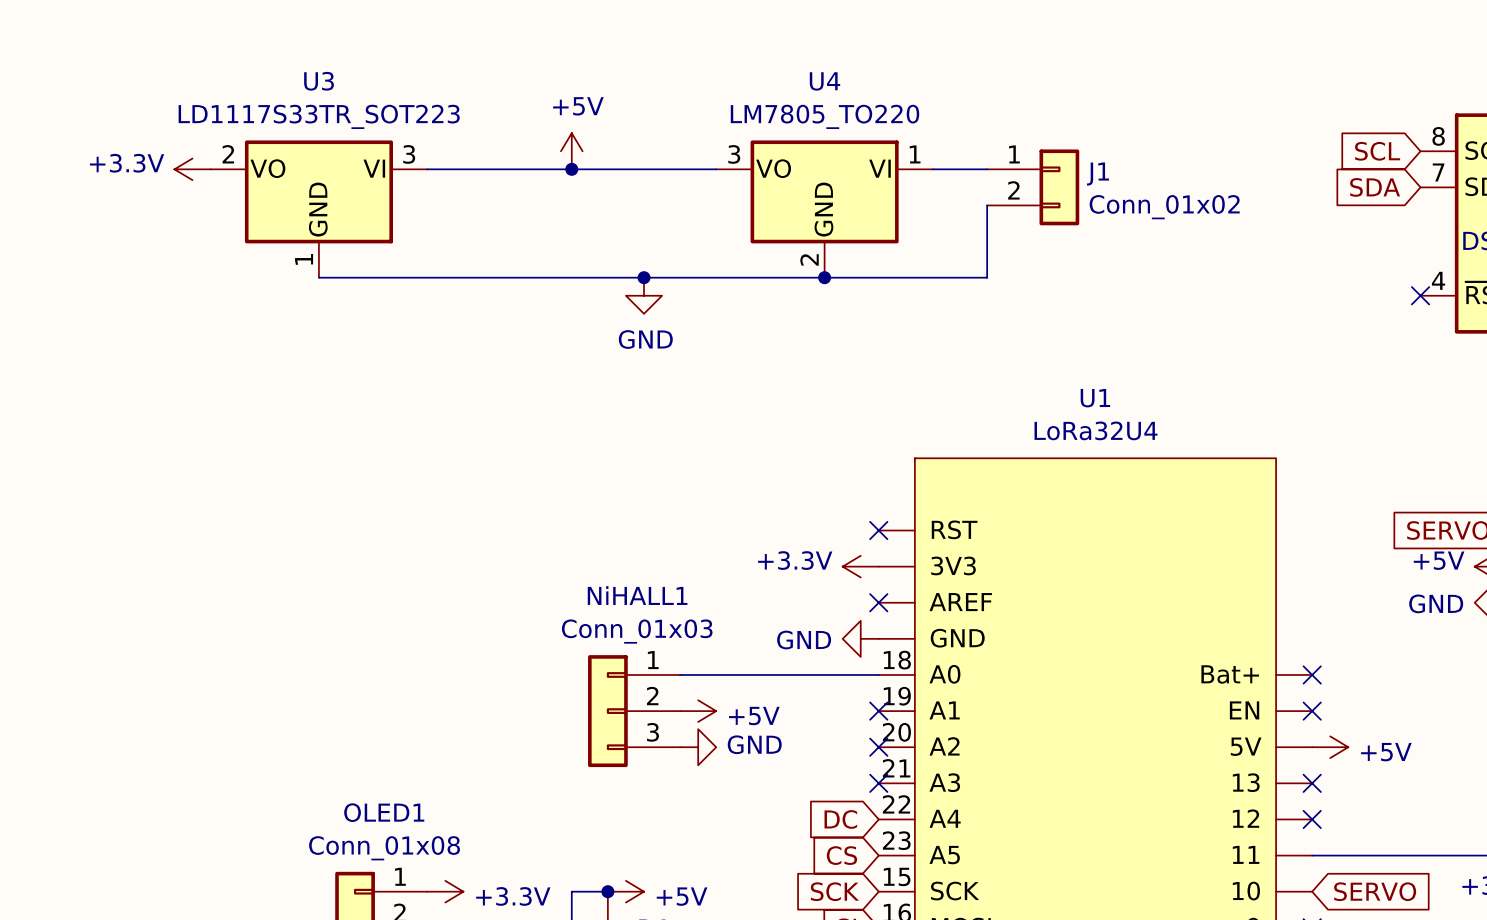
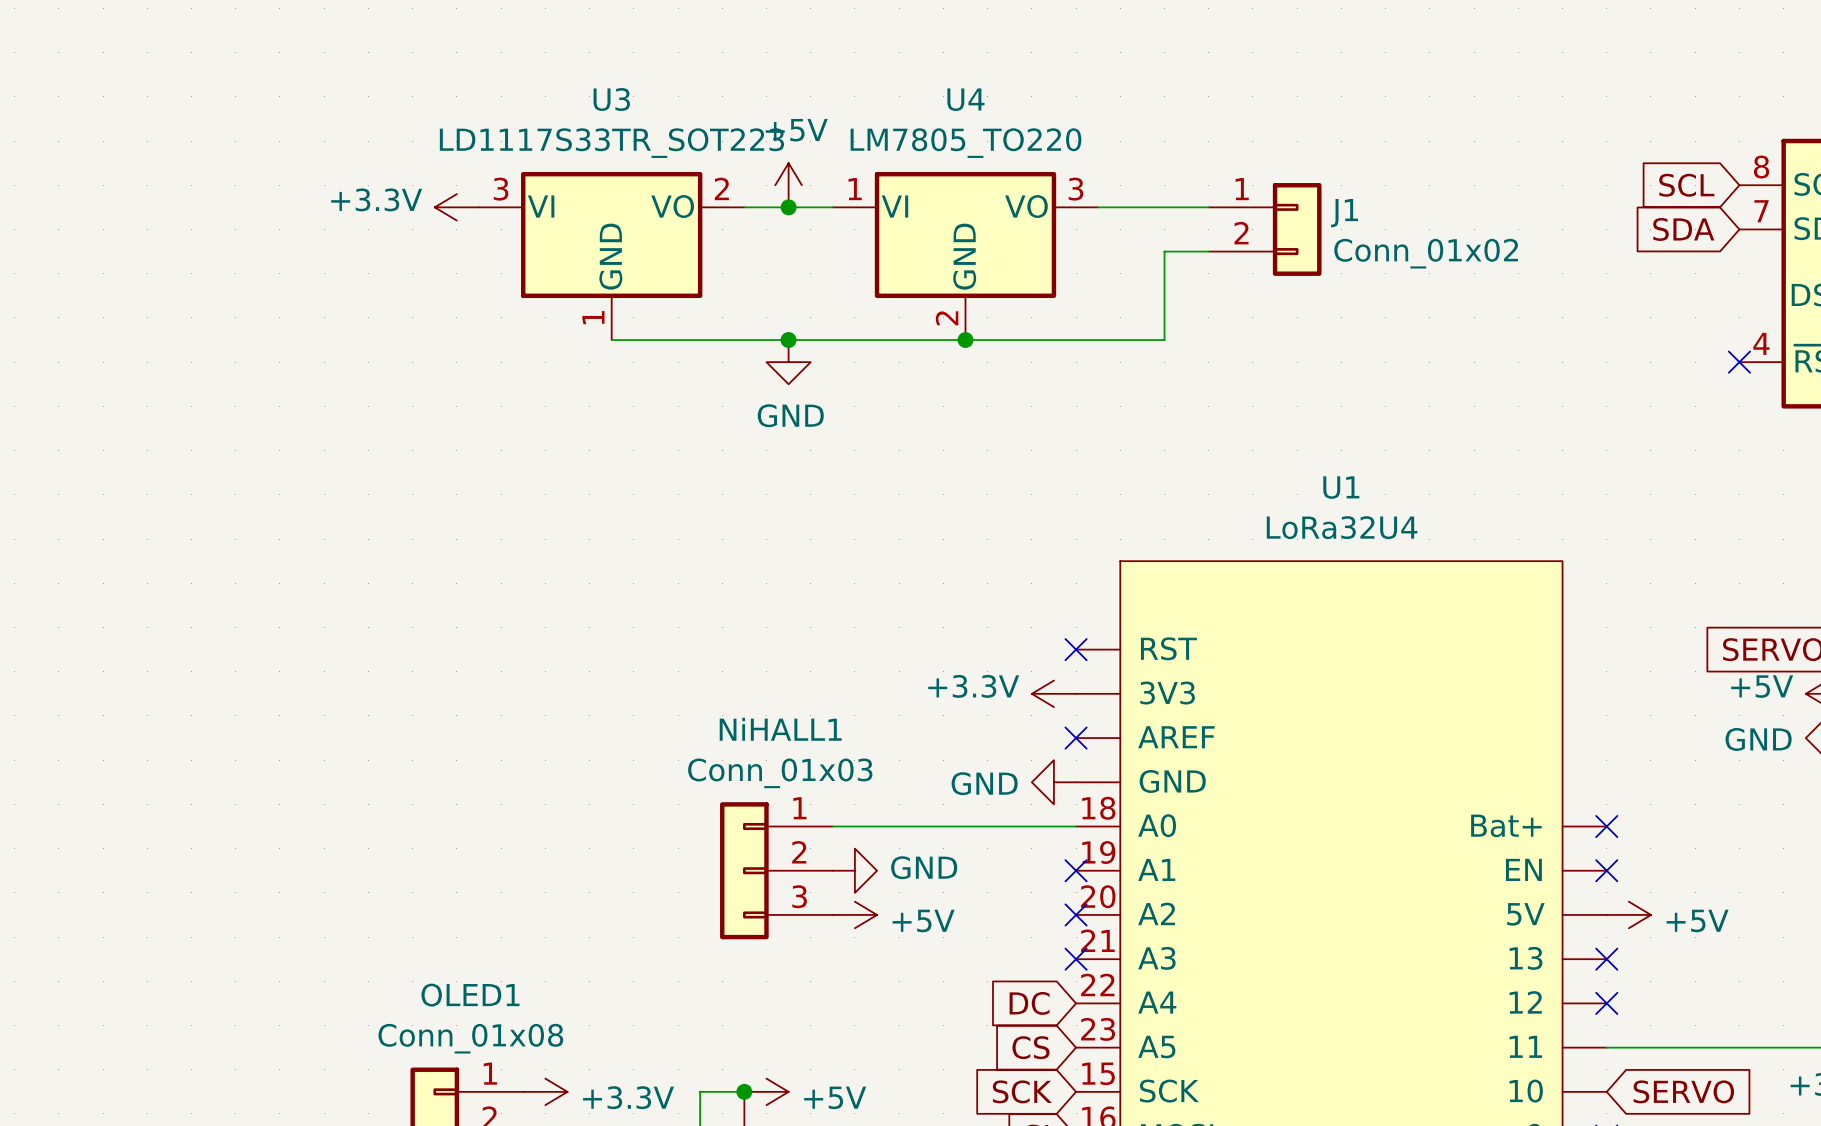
power symbol position: +5V (571, 151) -> +5V (788, 185)
power symbol position: +3.3V (192, 169) -> +3.3V (456, 207)
junction position: (571, 169) -> (788, 207)
U3 flip: as is (318, 191) -> left-right (611, 234)
U4 flip: as is (824, 191) -> left-right (965, 234)
wire: (987, 205) (987, 277) (951, 277) -> (1208, 251) (1164, 251) (1164, 340)
U3 position: (318, 209) -> (611, 255)
wire: (318, 277) (499, 277) -> none
junction position: (824, 277) -> (965, 340)
power symbol: +5V (698, 711) -> GND (854, 870)
power symbol: GND (698, 747) -> +5V (854, 914)

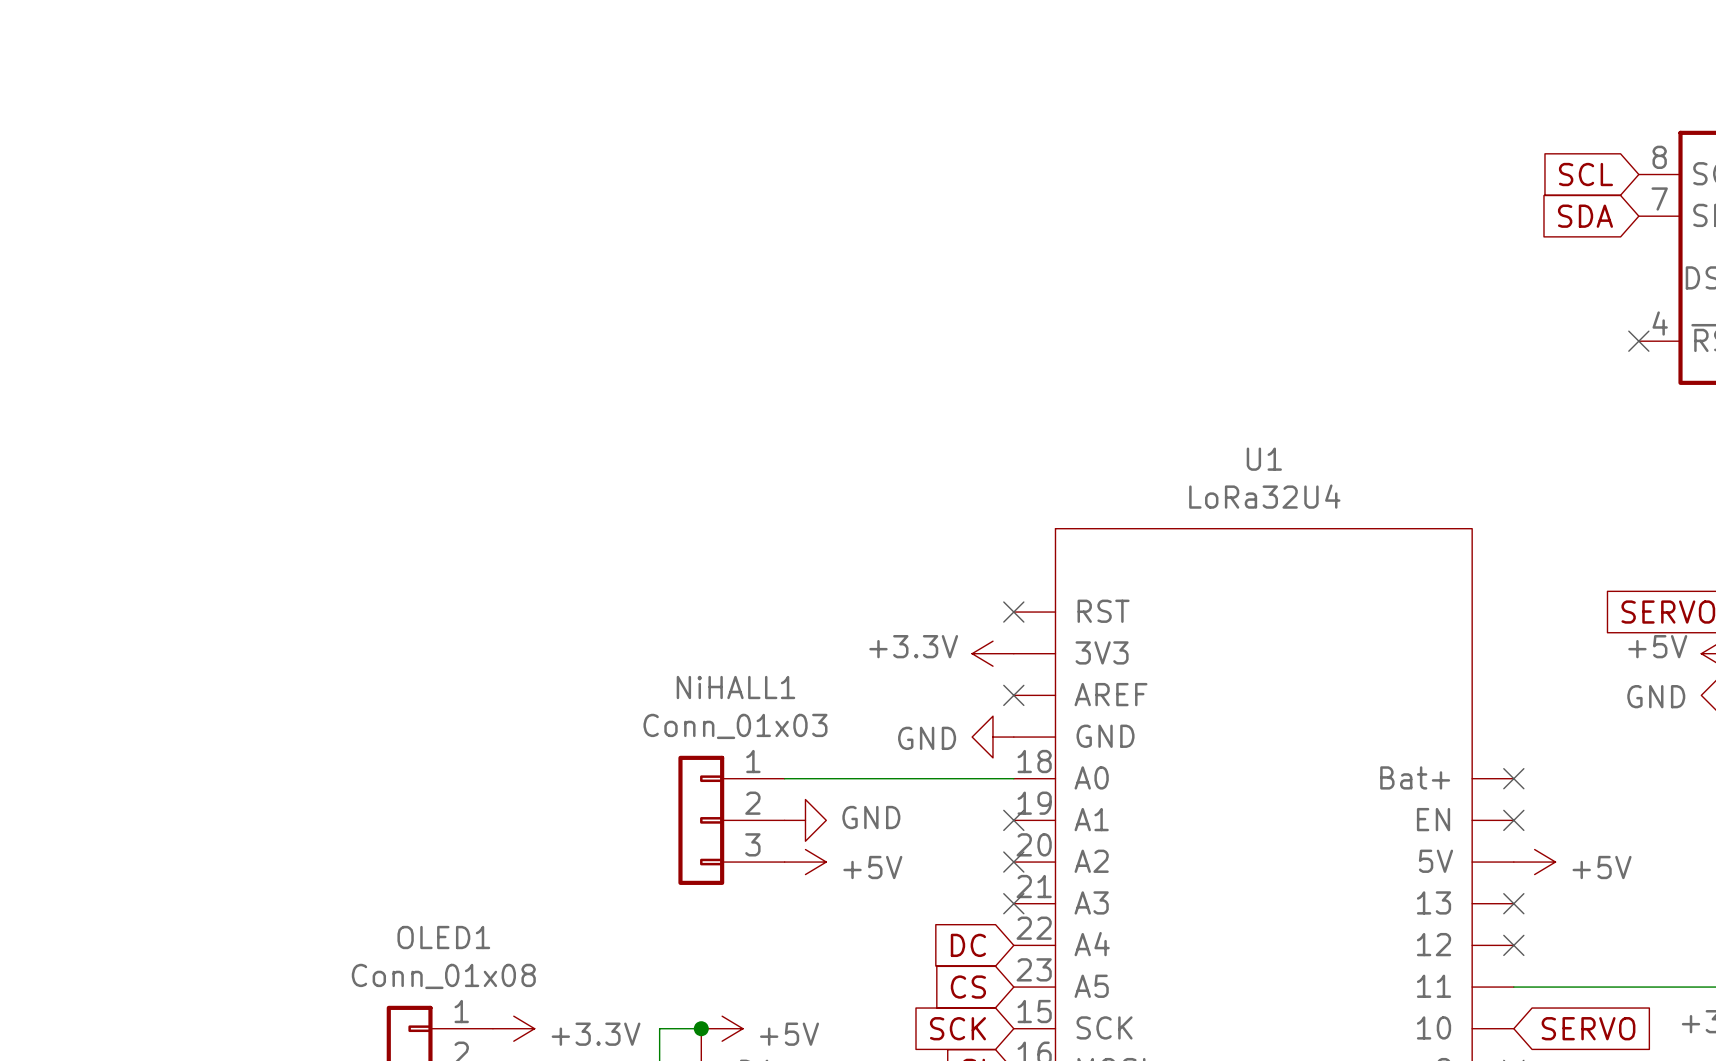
power symbol: +5V (788, 185) -> none
power symbol: +3.3V (456, 207) -> none
wire: (744, 207) (832, 207) -> none
junction: (788, 207) -> none
wire: (1098, 207) (1208, 207) -> none
J1: Conn_01x02 (1265, 229) -> none
wire: (1208, 251) (1164, 251) (1164, 340) (611, 340) -> none
U3: LD1117S33TR_SOT223 (611, 255) -> none
U4: LM7805_TO220 (965, 255) -> none
junction: (788, 340) -> none
junction: (965, 340) -> none
power symbol: GND (788, 362) -> none

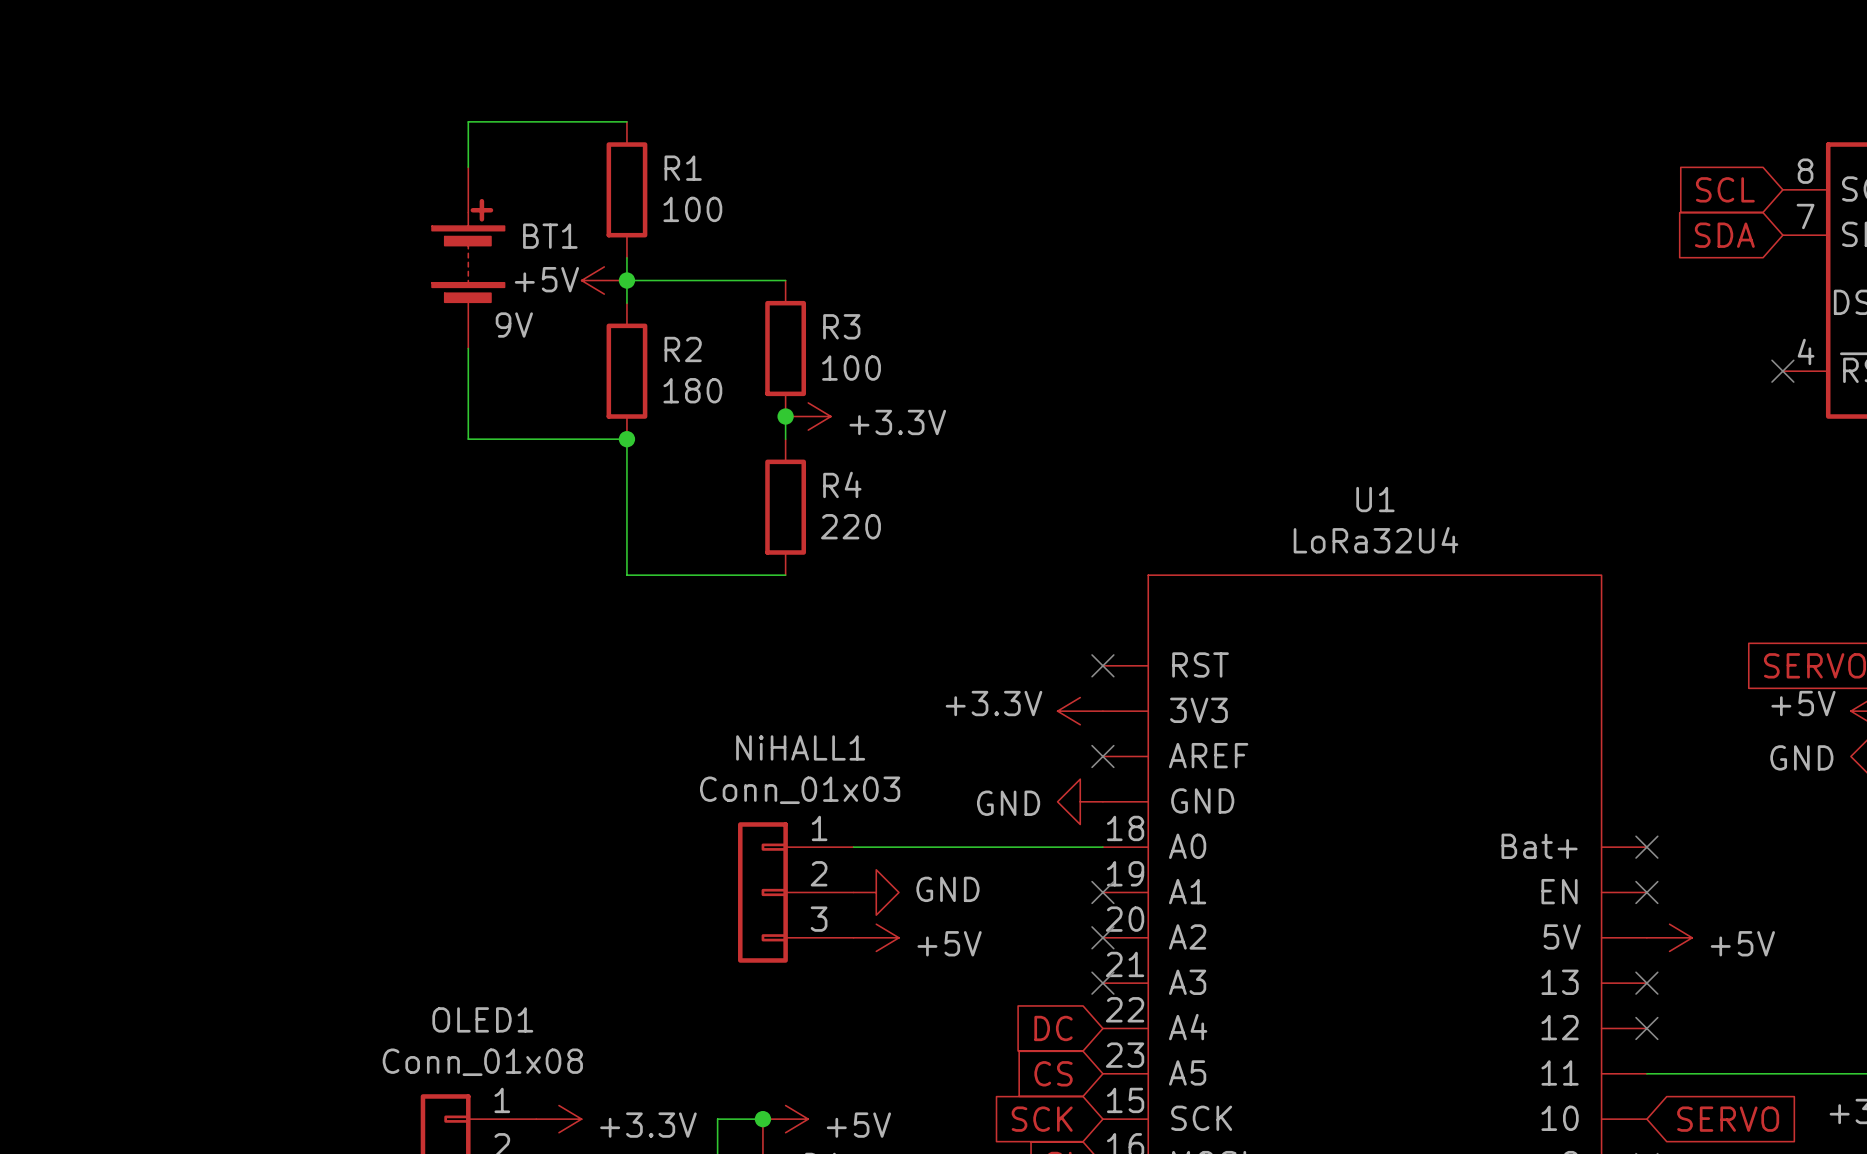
wire: none -> (626, 121) (468, 121) (468, 167)
R1: none -> 100 (626, 189)
BT1: none -> 9V (468, 257)
wire: none -> (626, 257) (626, 303)
power symbol: none -> +5V (604, 280)
wire: none -> (626, 280) (785, 280)
junction: none -> (626, 280)
wire: none -> (468, 348) (468, 439) (626, 439) (626, 575) (785, 575)
R3: none -> 100 (785, 348)
R2: none -> 180 (626, 371)
wire: none -> (785, 416) (785, 439)
junction: none -> (785, 416)
power symbol: none -> +3.3V (808, 416)
junction: none -> (626, 439)
R4: none -> 220 (785, 507)

